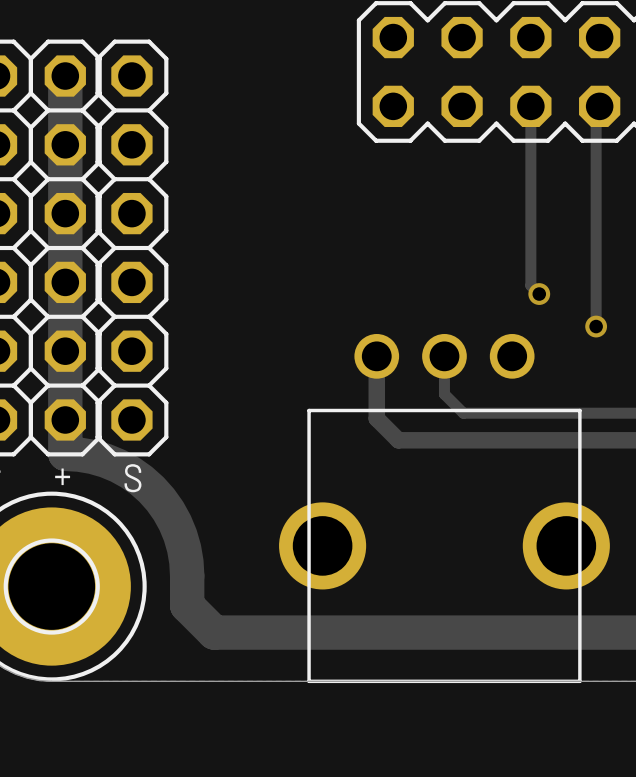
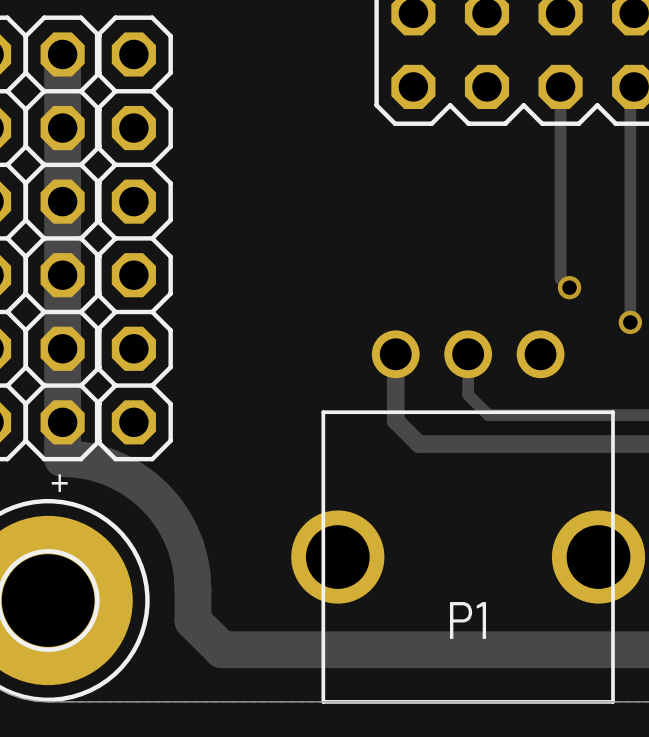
text: S (132, 478) -> none
P1 name: none -> P1 (468, 620)

